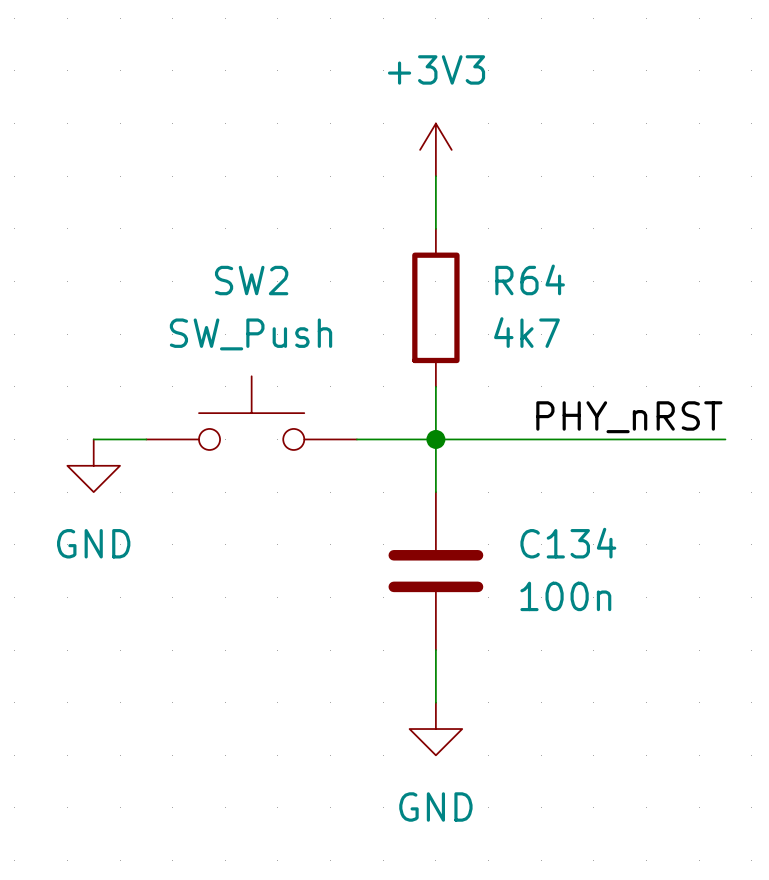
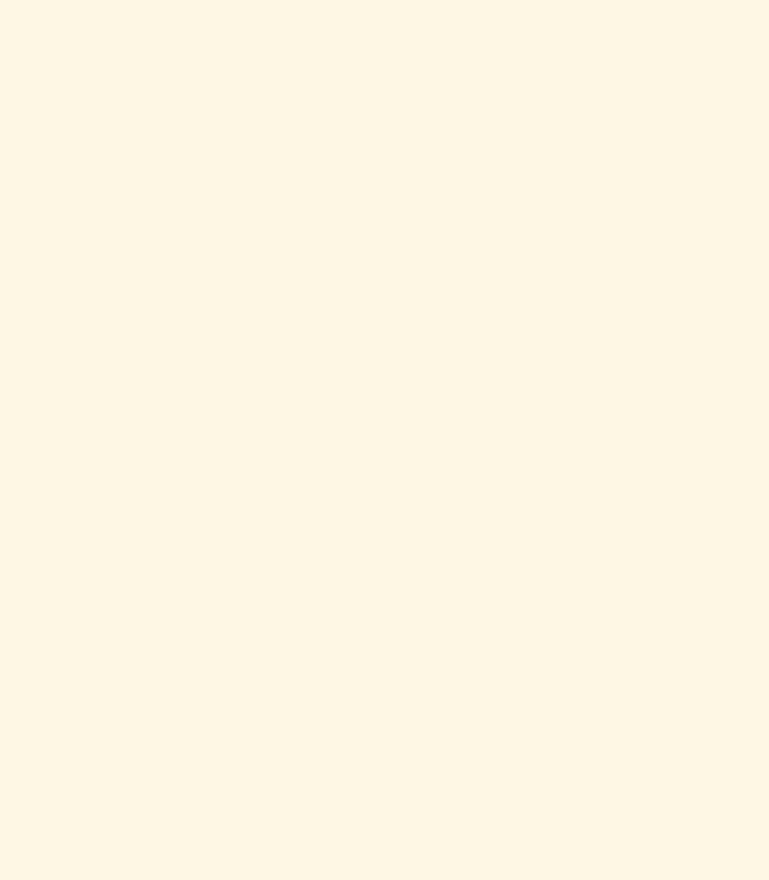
power symbol: +3V3 (435, 149) -> none
wire: (435, 176) (435, 228) -> none
R64: 4k7 (435, 307) -> none
wire: (435, 386) (435, 492) -> none
SW2: SW_Push (251, 413) -> none
label: PHY_nRST (629, 417) -> none
wire: (93, 439) (146, 439) -> none
wire: (356, 439) (725, 439) -> none
junction: (435, 439) -> none
power symbol: GND (93, 465) -> none
C134: 100n (435, 571) -> none
wire: (435, 650) (435, 702) -> none
power symbol: GND (435, 729) -> none

